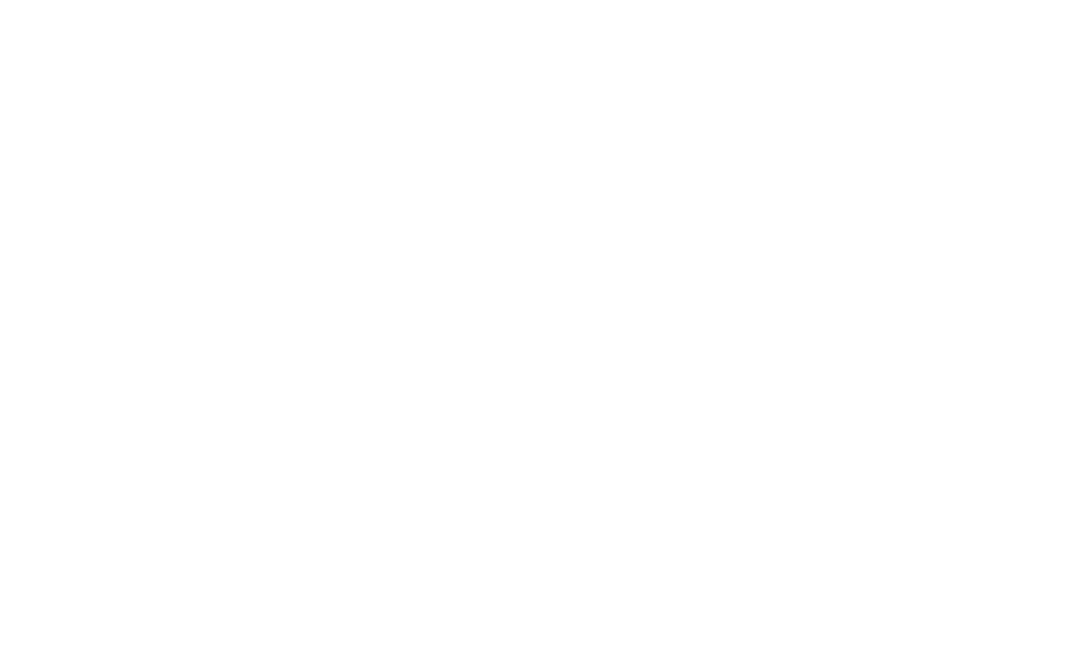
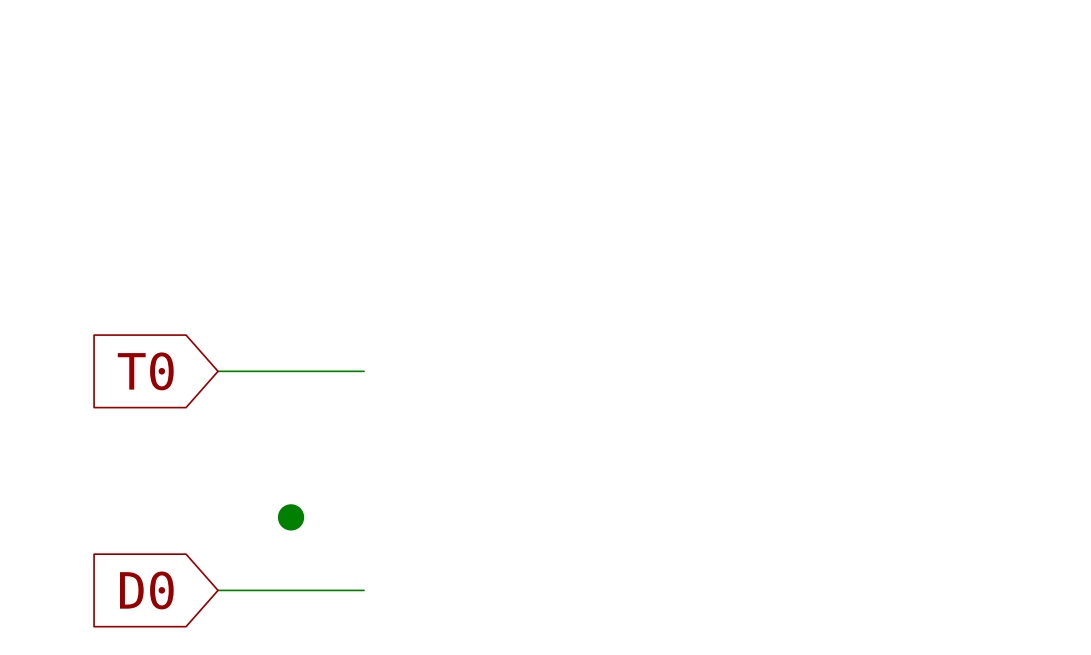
global label: none -> T0 (145, 371)
wire: none -> (218, 371) (364, 371)
junction: none -> (291, 517)
global label: none -> D0 (146, 590)
wire: none -> (218, 590) (364, 590)

